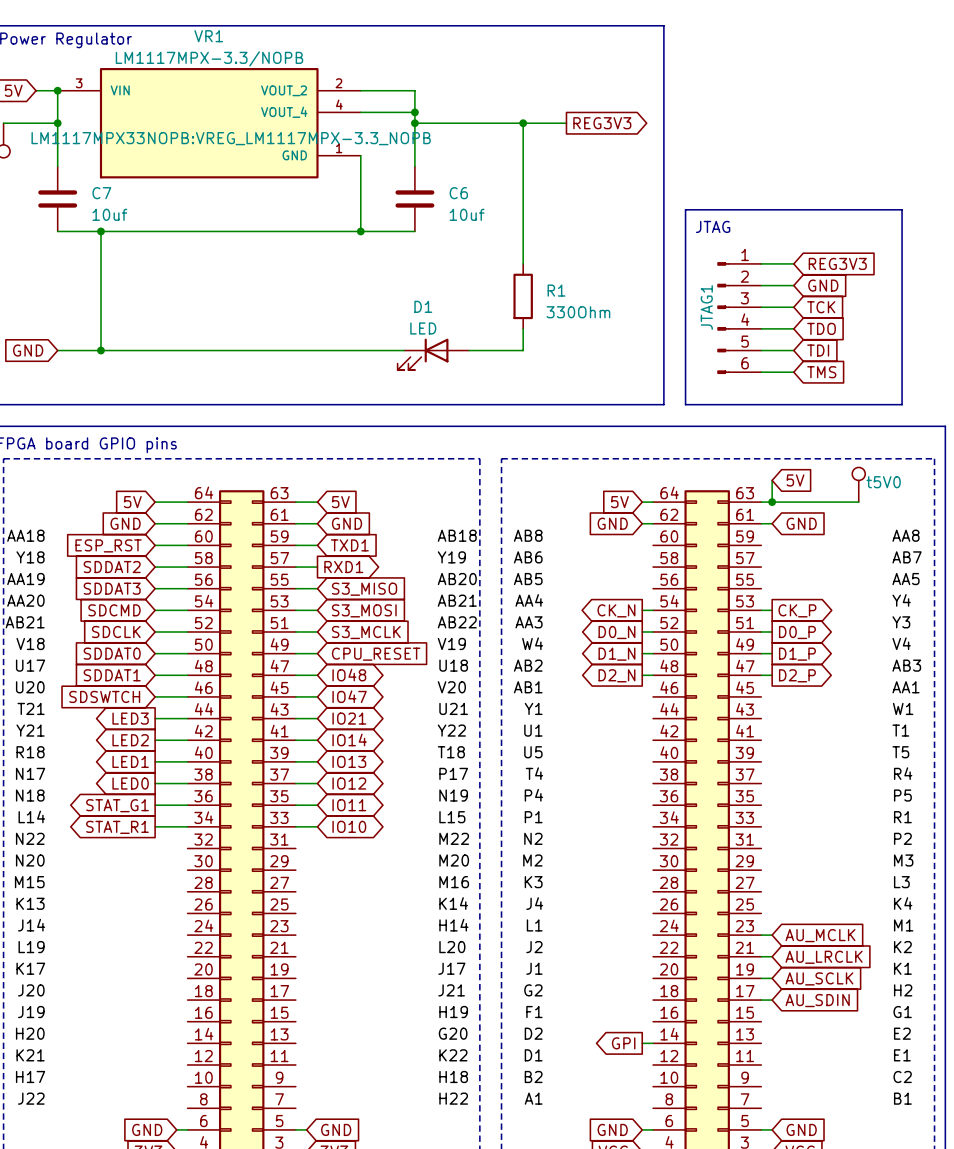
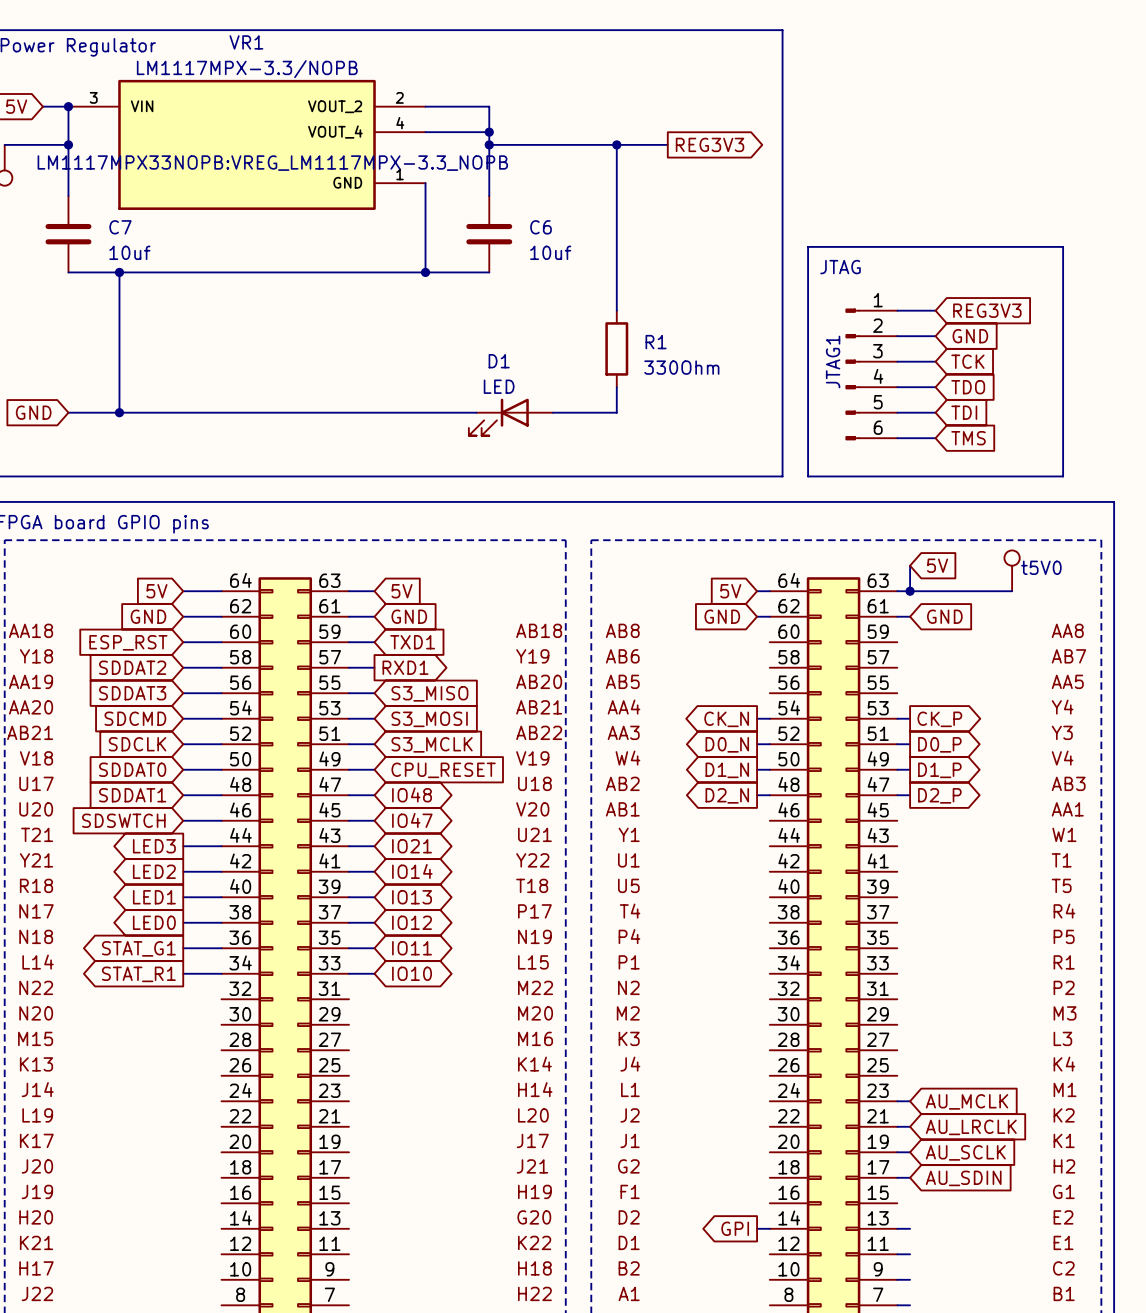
wire: none -> (897, 1228) (910, 1228)
wire: none -> (897, 1254) (910, 1254)
wire: none -> (897, 1279) (910, 1279)
wire: none -> (897, 1305) (910, 1305)

